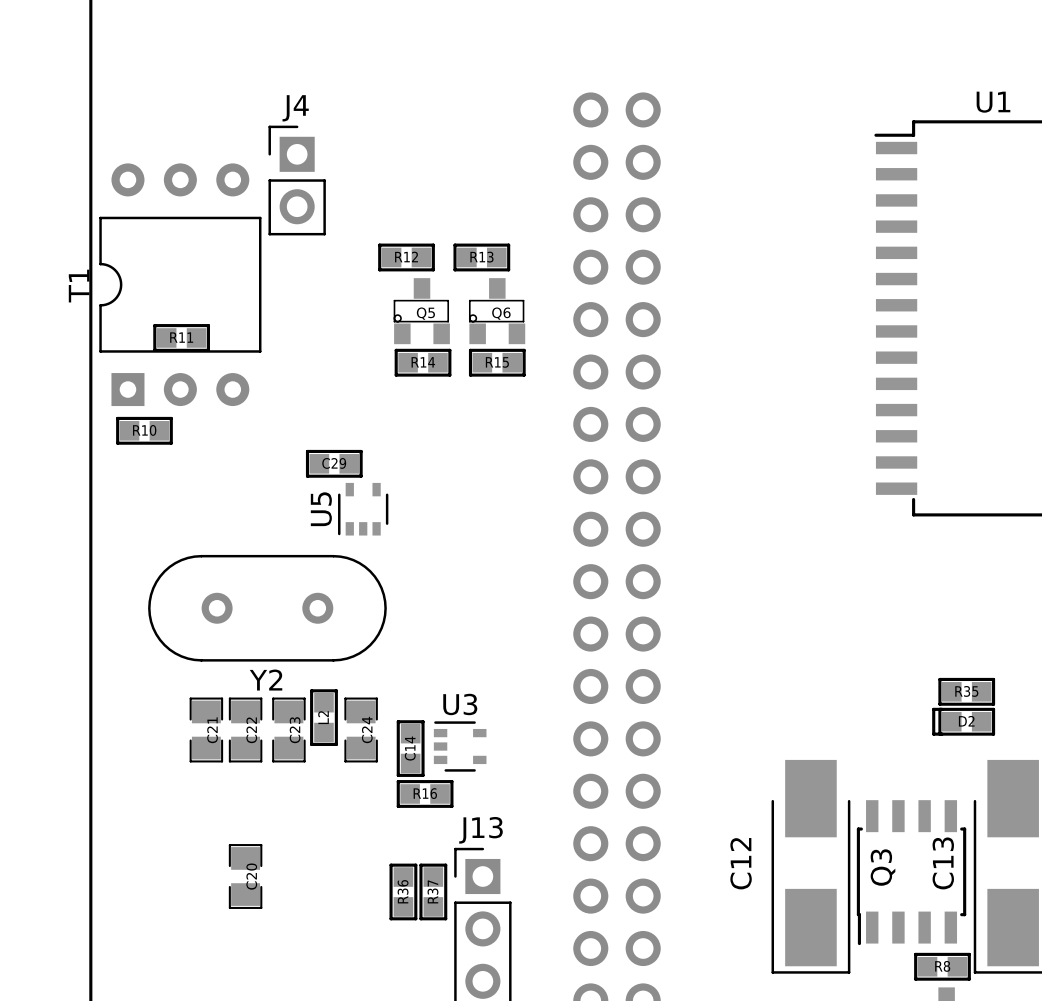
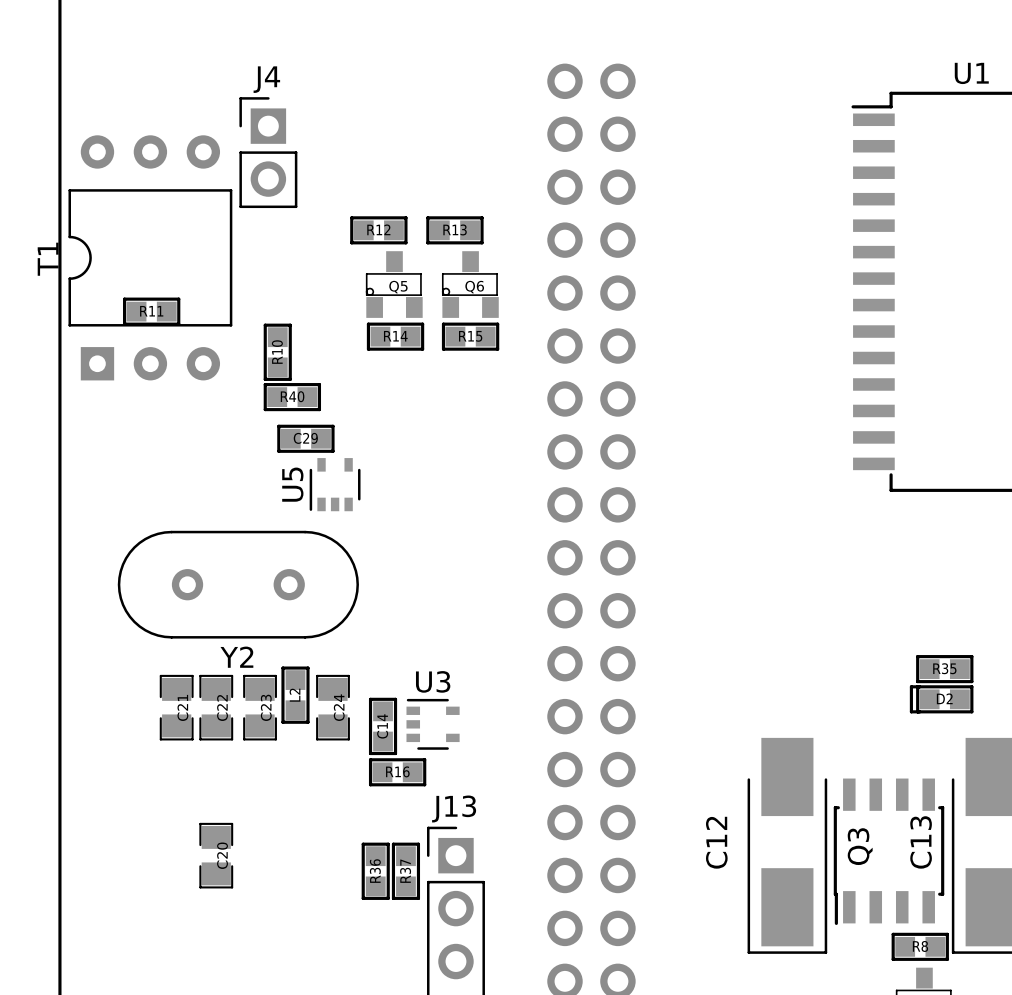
R40: none -> (292, 397)
R10 rotation: 0° (144, 430) -> 90° clockwise (277, 352)
R10 position: (144, 430) -> (277, 352)

